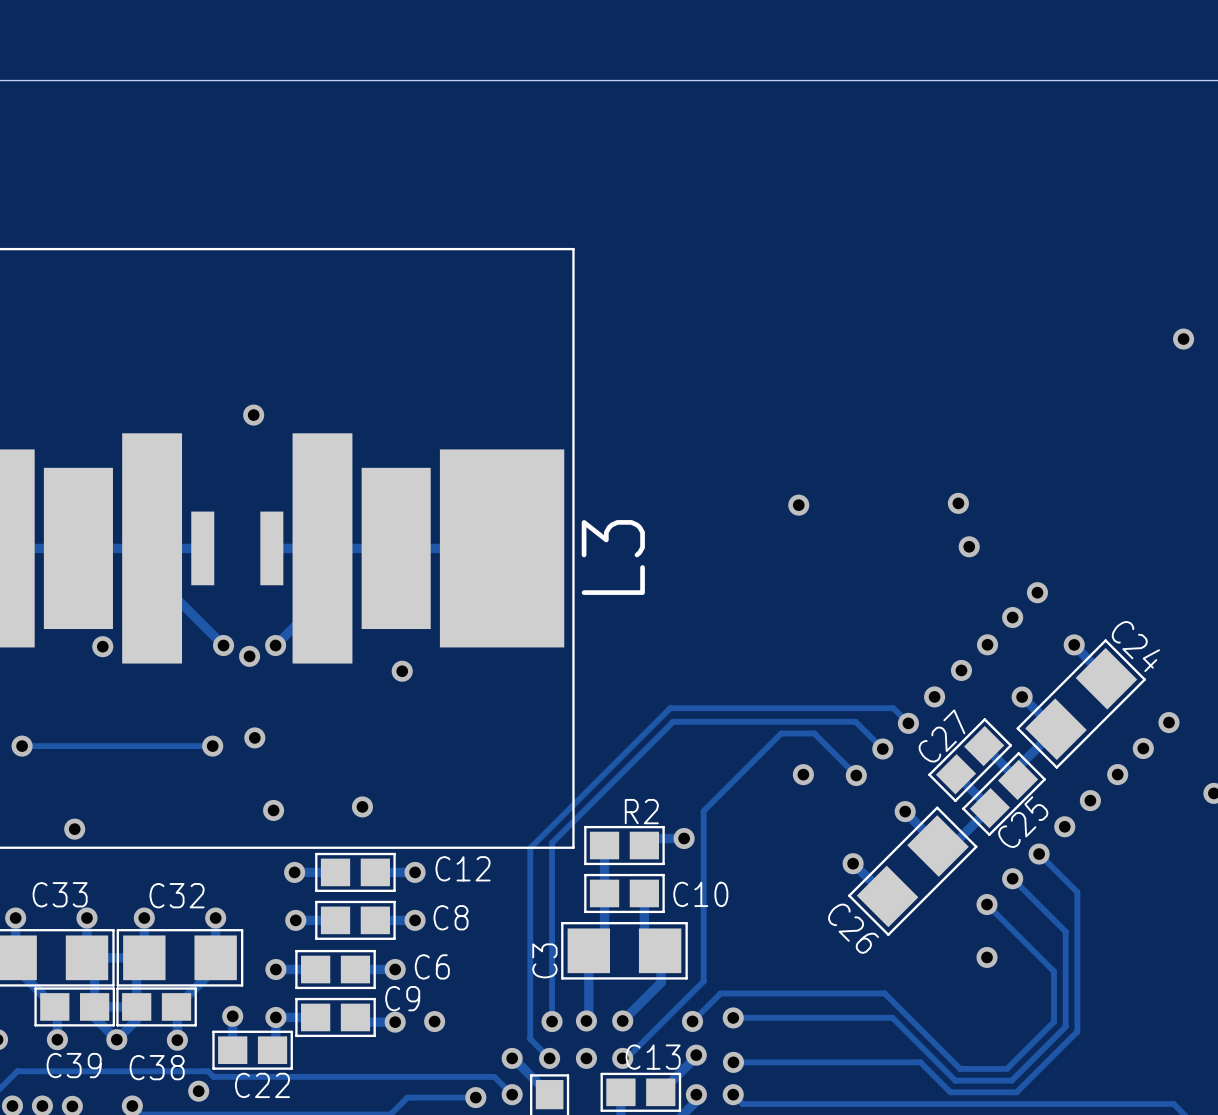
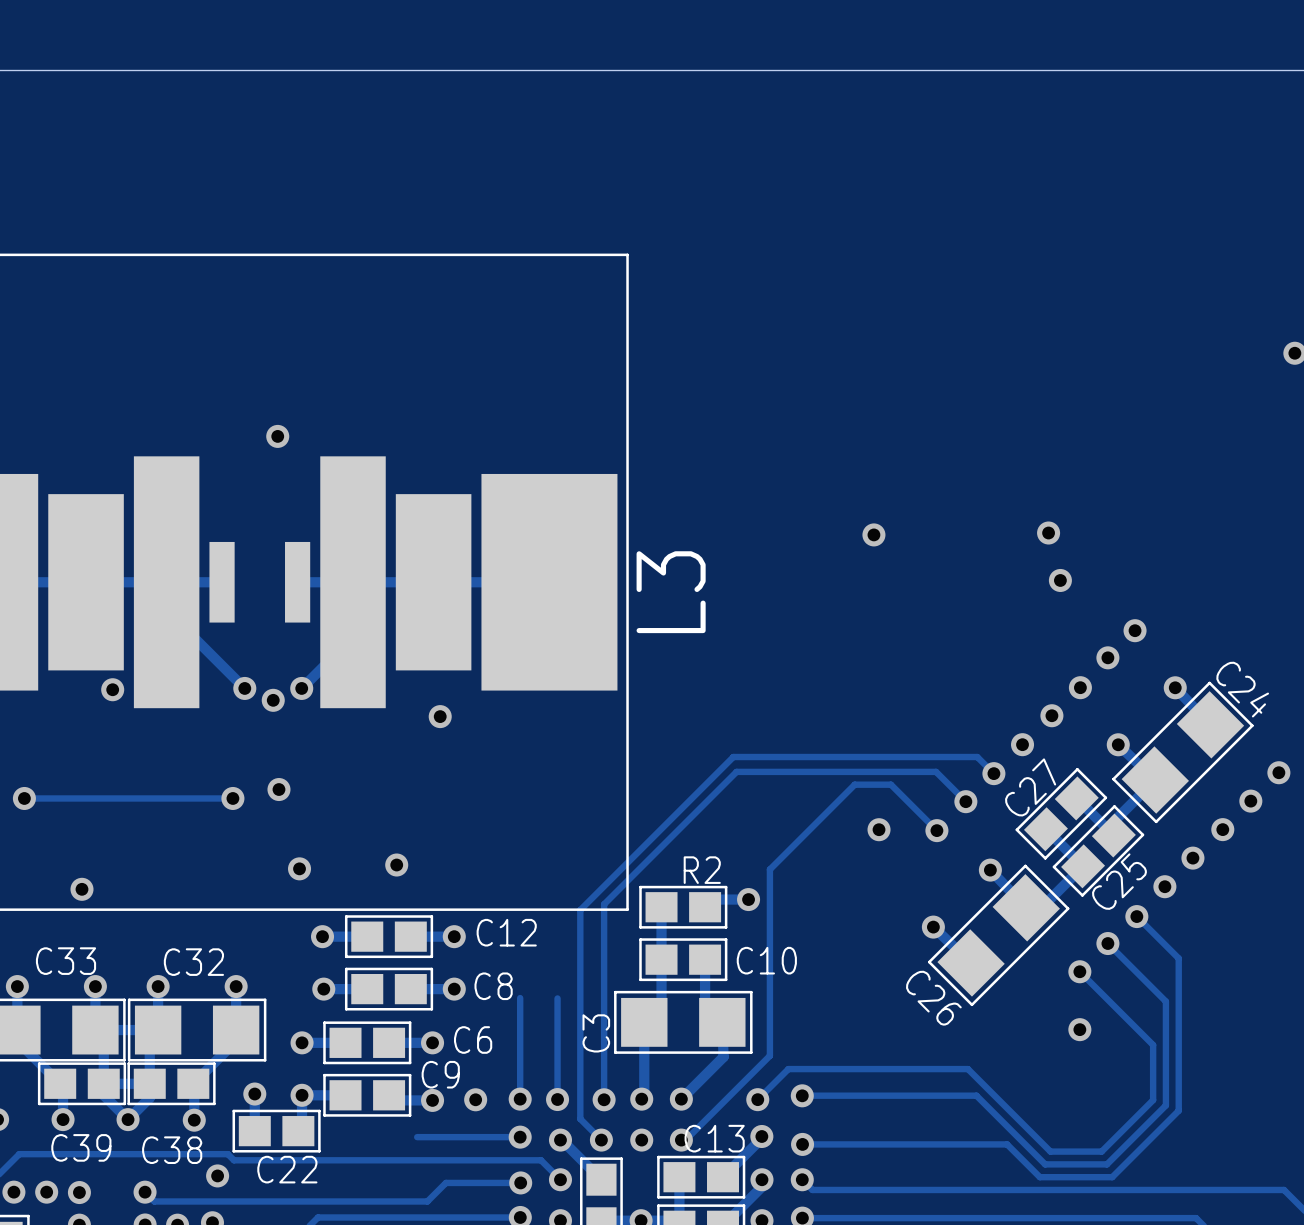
track: none -> (520, 998) (520, 1099)
track: none -> (557, 998) (557, 1099)
via: none -> (520, 1099)
via: none -> (557, 1099)
track: none -> (520, 1137) (417, 1137)
via: none -> (520, 1137)

